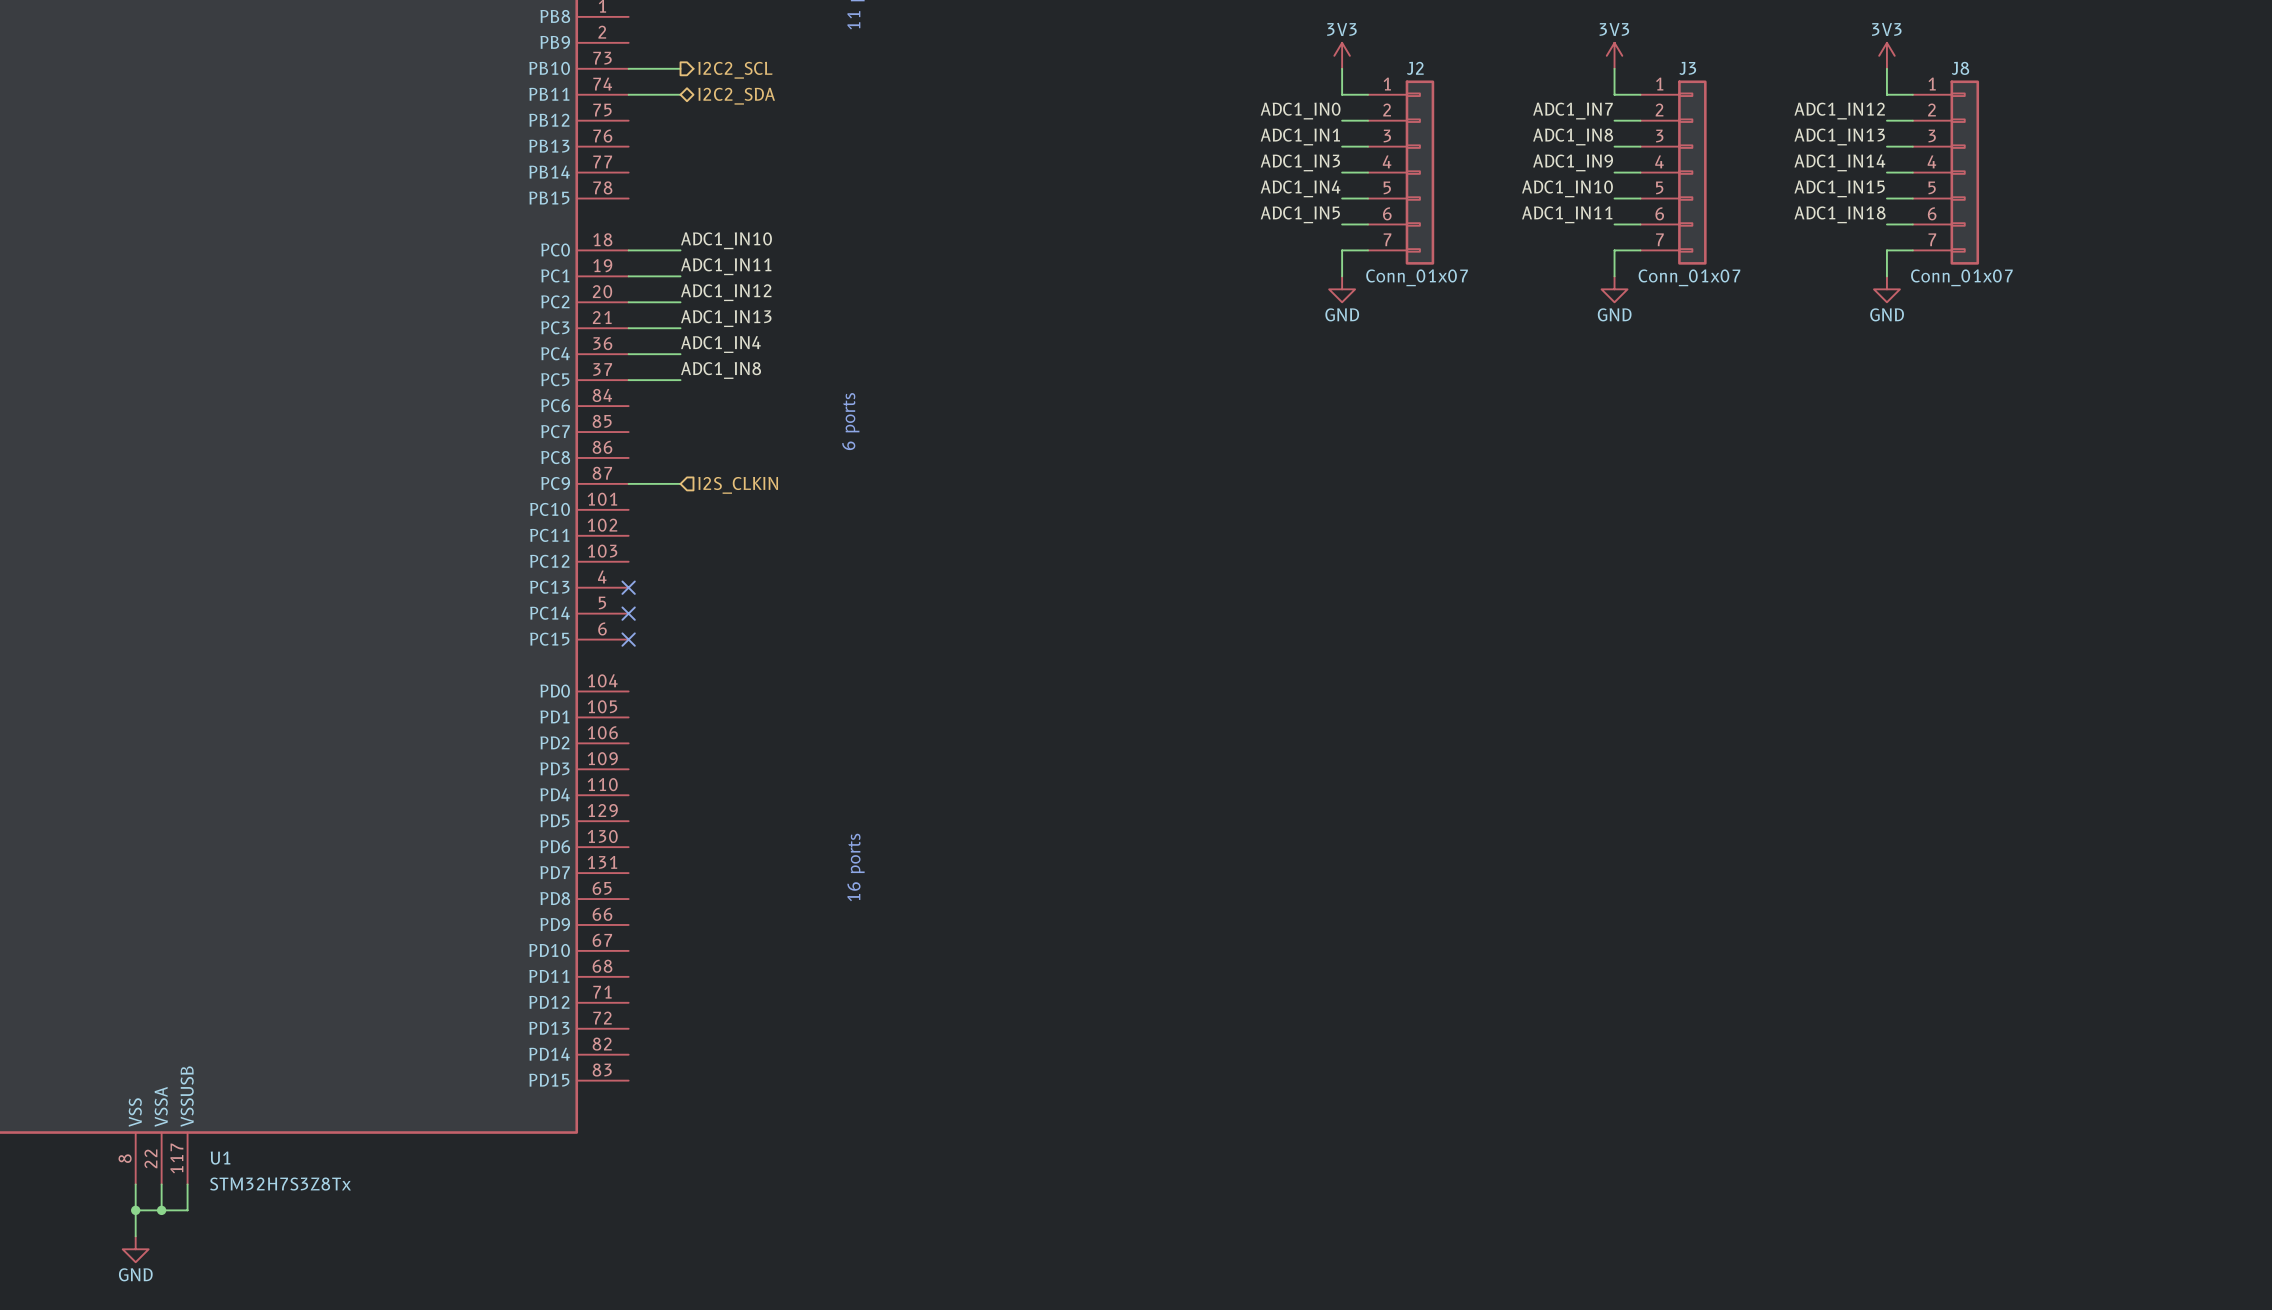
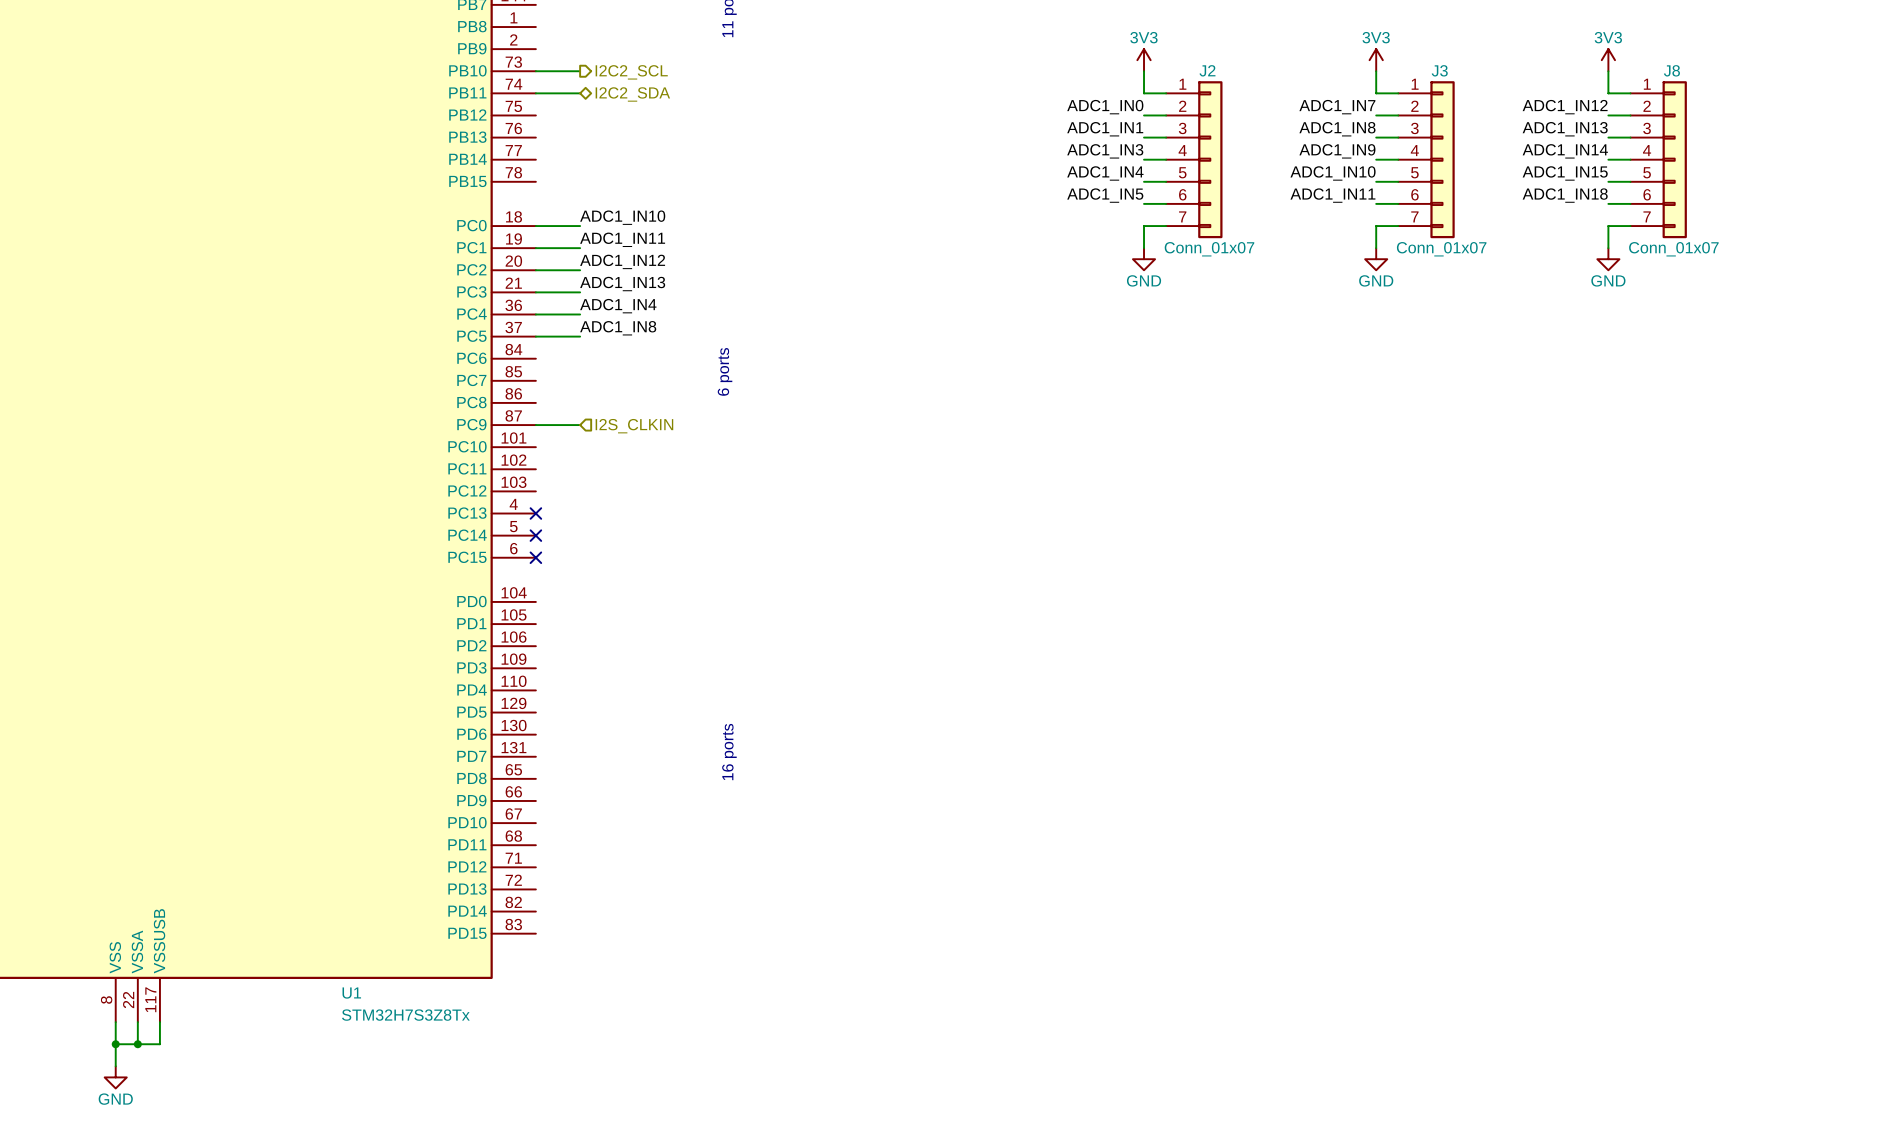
U1 name position: U1 (220, 1158) -> U1 (351, 993)
U1 value position: STM32H7S3Z8Tx (280, 1184) -> STM32H7S3Z8Tx (405, 1015)

